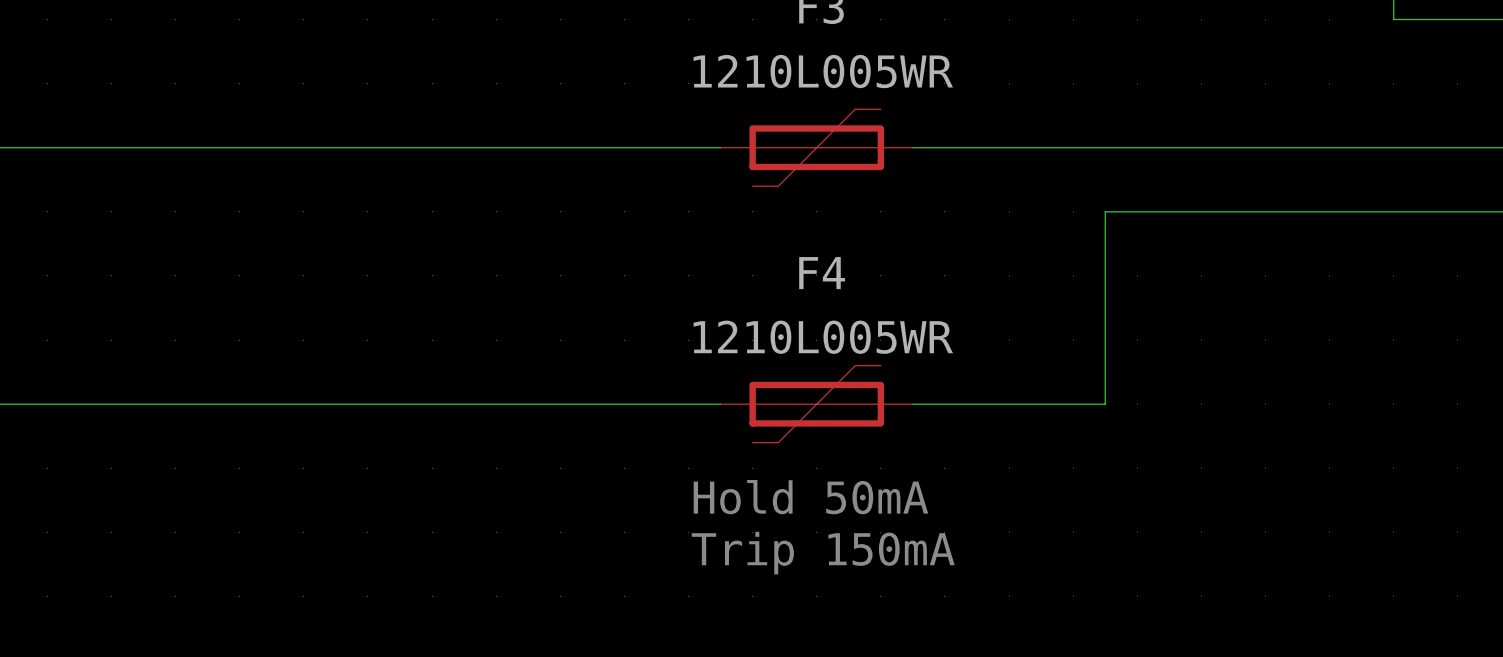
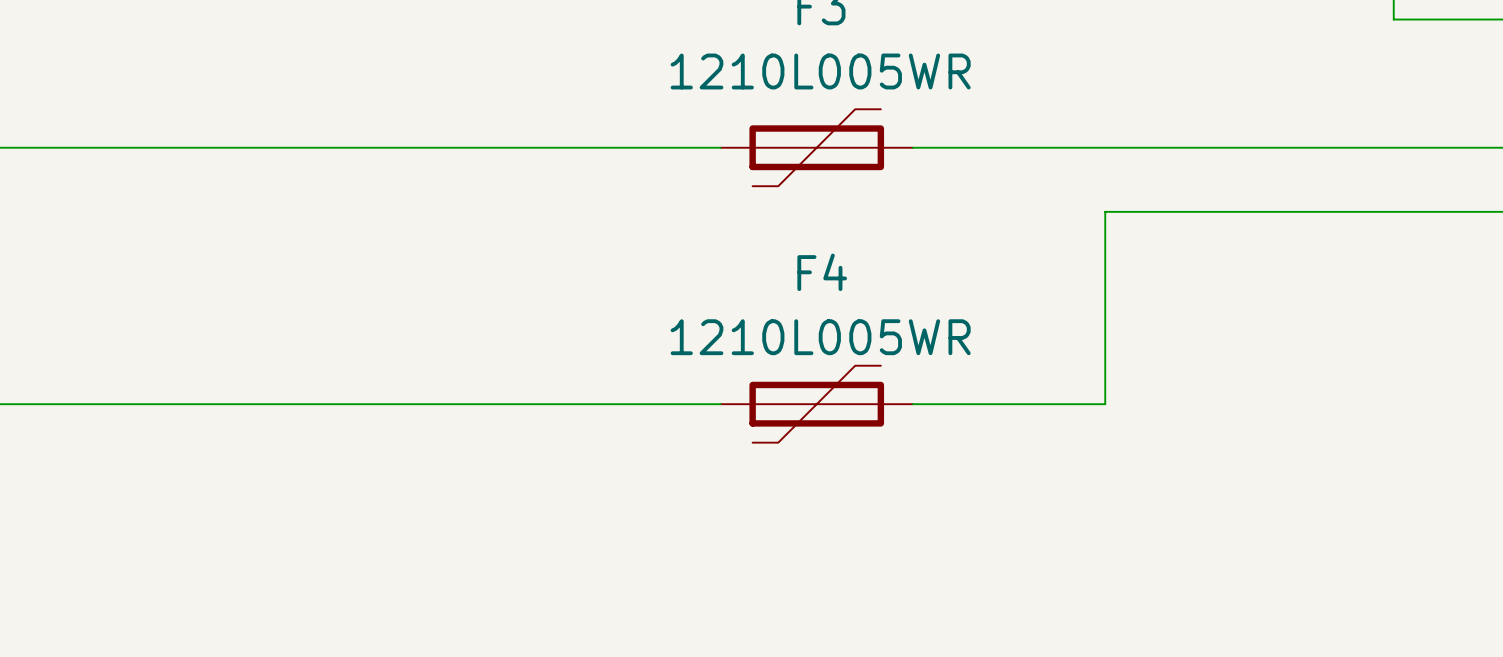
text: Hold 50mA (810, 497) -> none
text: Trip 150mA (823, 553) -> none

